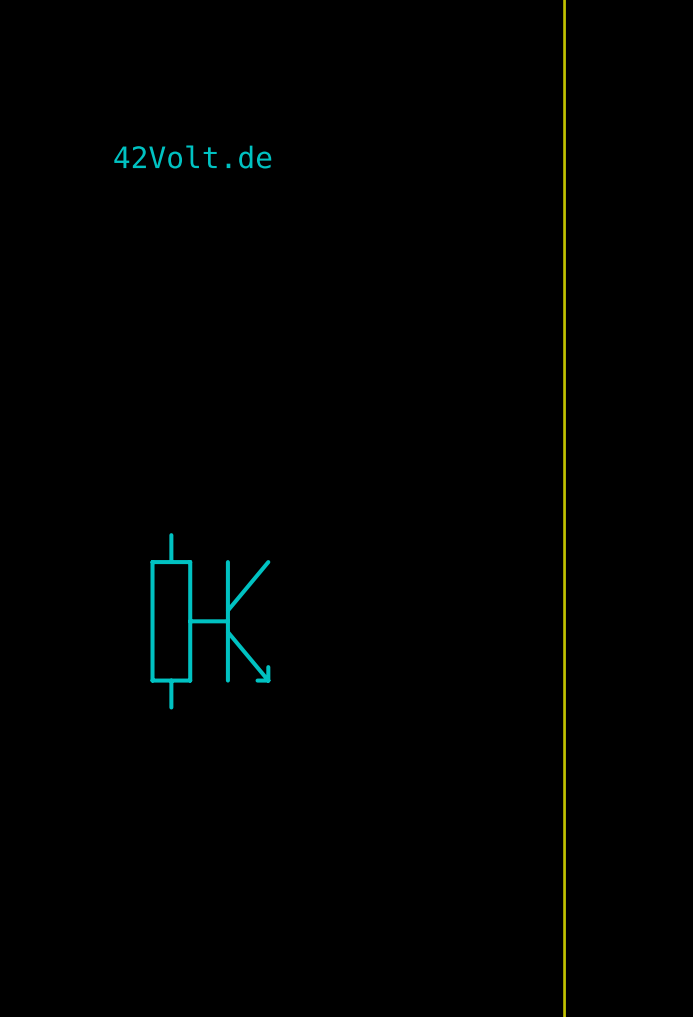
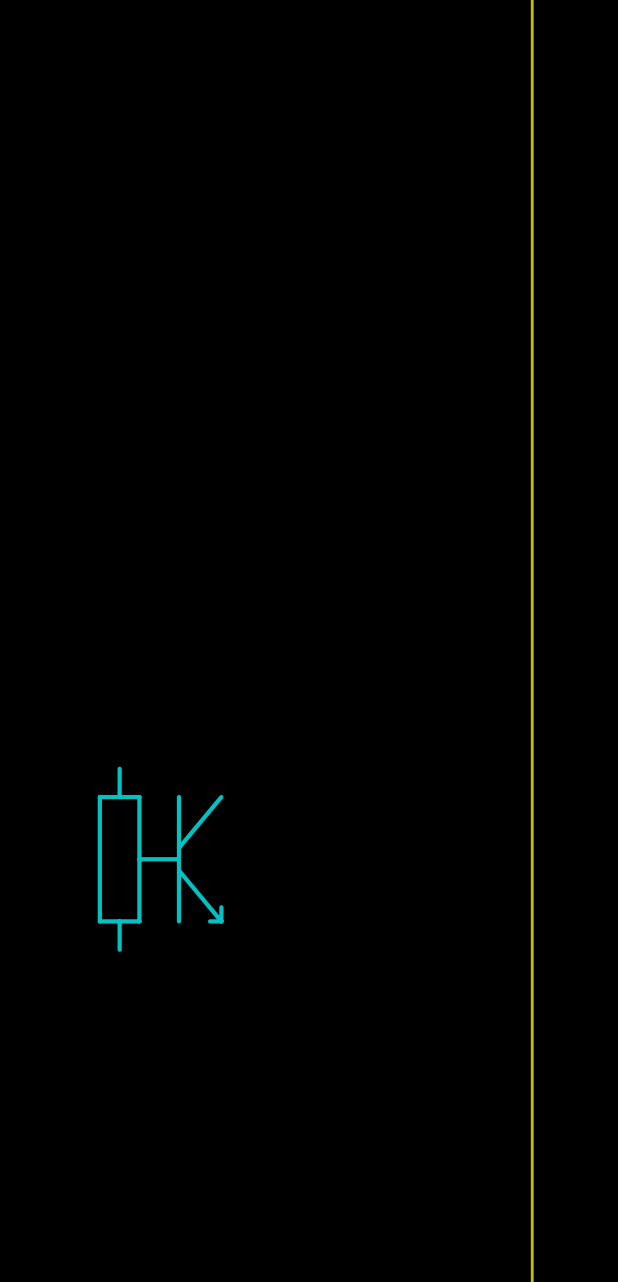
text: 42Volt.de (192, 156) -> none

